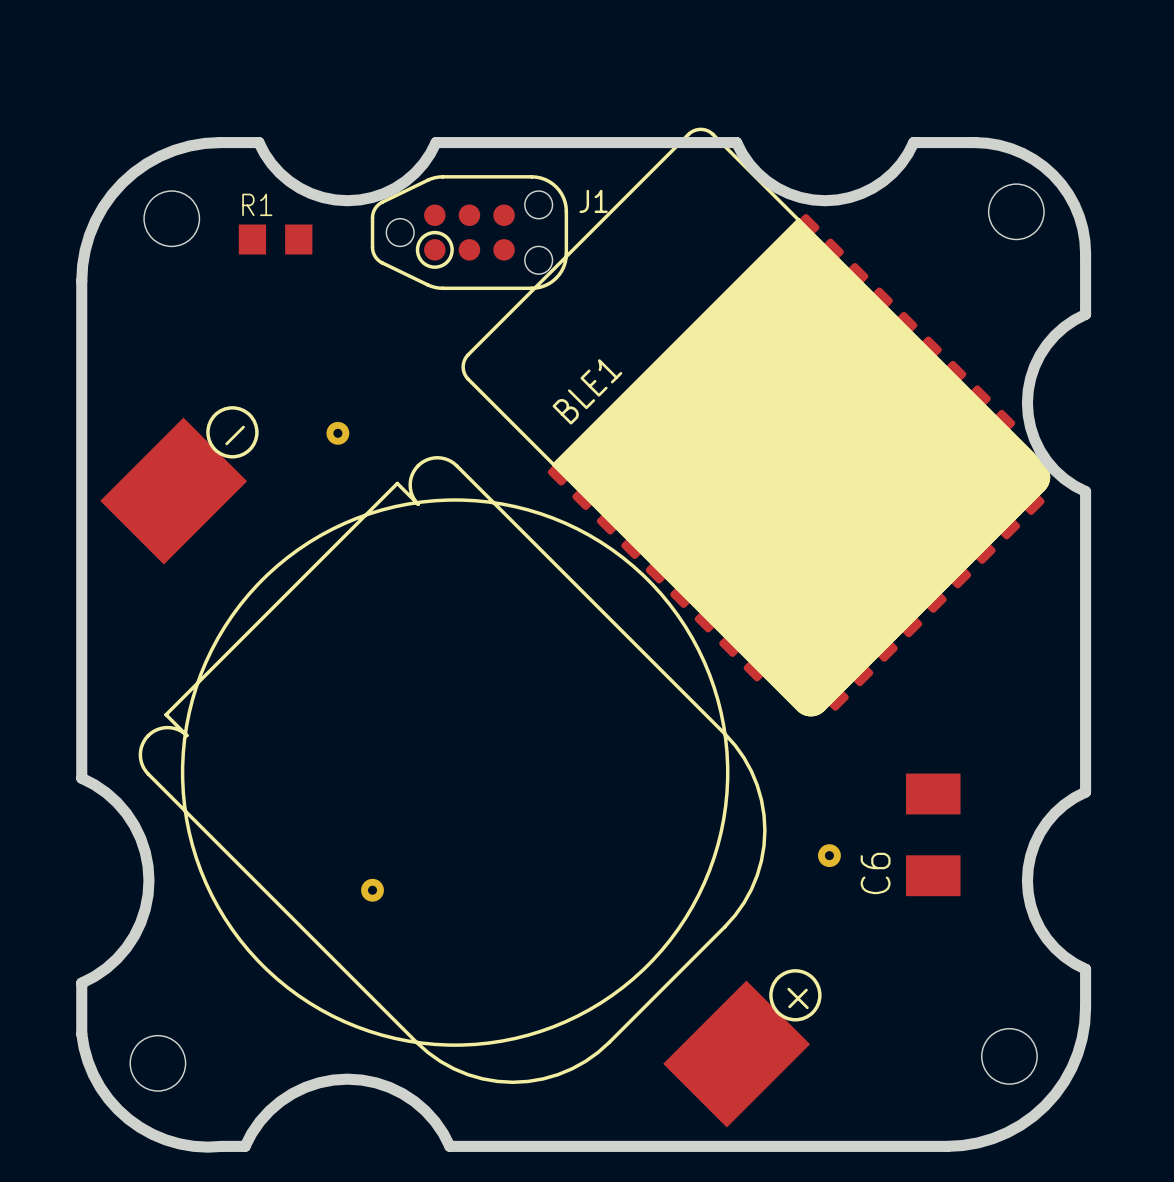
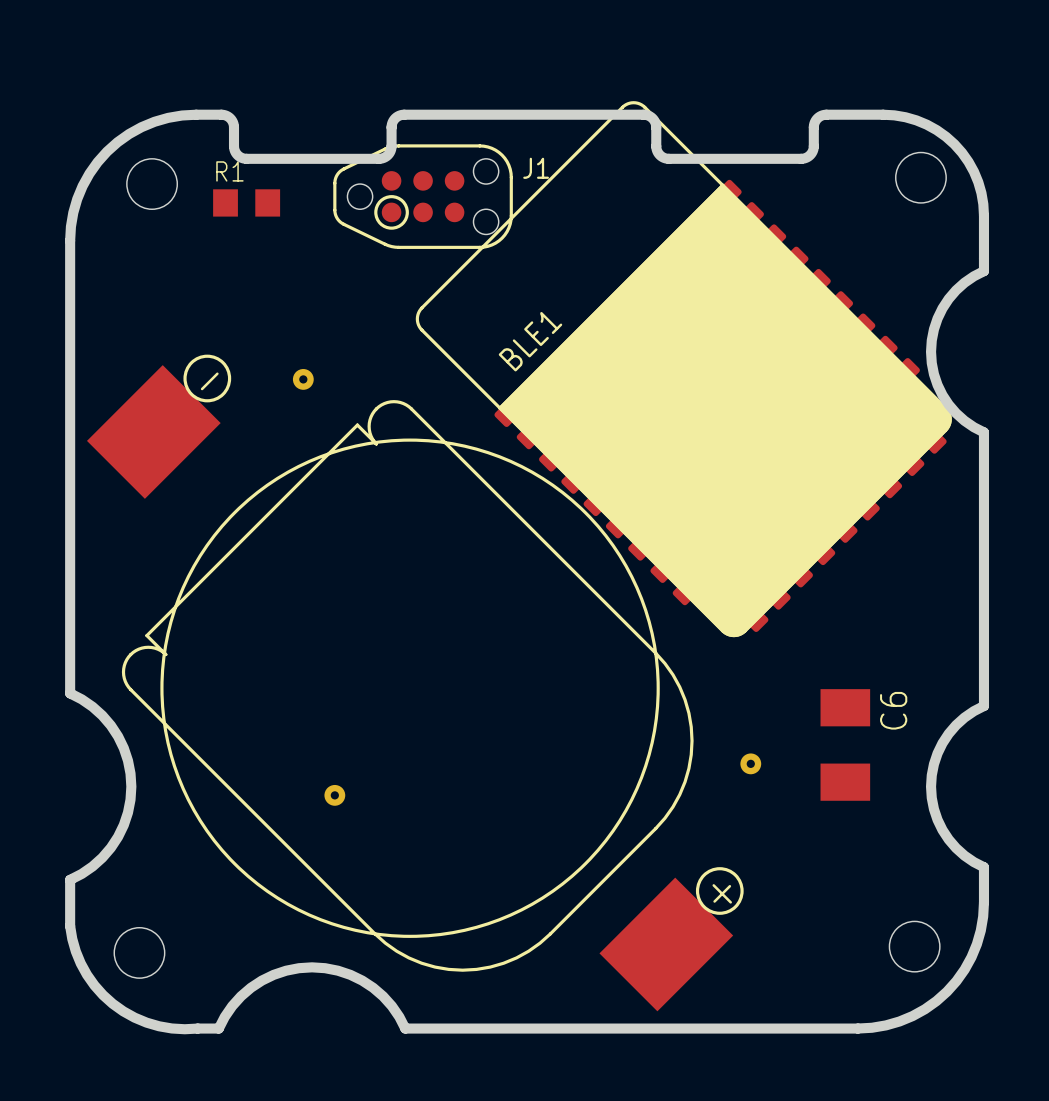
board edge: (247, 142) (258, 142) (271, 163) (279, 173) (299, 188) (322, 197) (347, 200) (372, 197) (395, 188) (415, 173) (423, 163) (436, 142) (448, 142) -> (221, 114) (227, 116) (232, 121) (234, 151) (238, 156) (246, 158) (382, 158) (387, 155) (391, 149) (393, 121) (397, 116) (404, 114)
board edge: (711, 142) (736, 142) (749, 163) (757, 173) (777, 188) (800, 197) (825, 200) (849, 197) (872, 188) (892, 173) (901, 163) (913, 142) -> (643, 114) (649, 116) (654, 121) (657, 151) (661, 156) (668, 158) (804, 158) (810, 155) (813, 149) (815, 121) (820, 116) (827, 114)
C6 name position: C6 (875, 873) -> C6 (893, 710)

